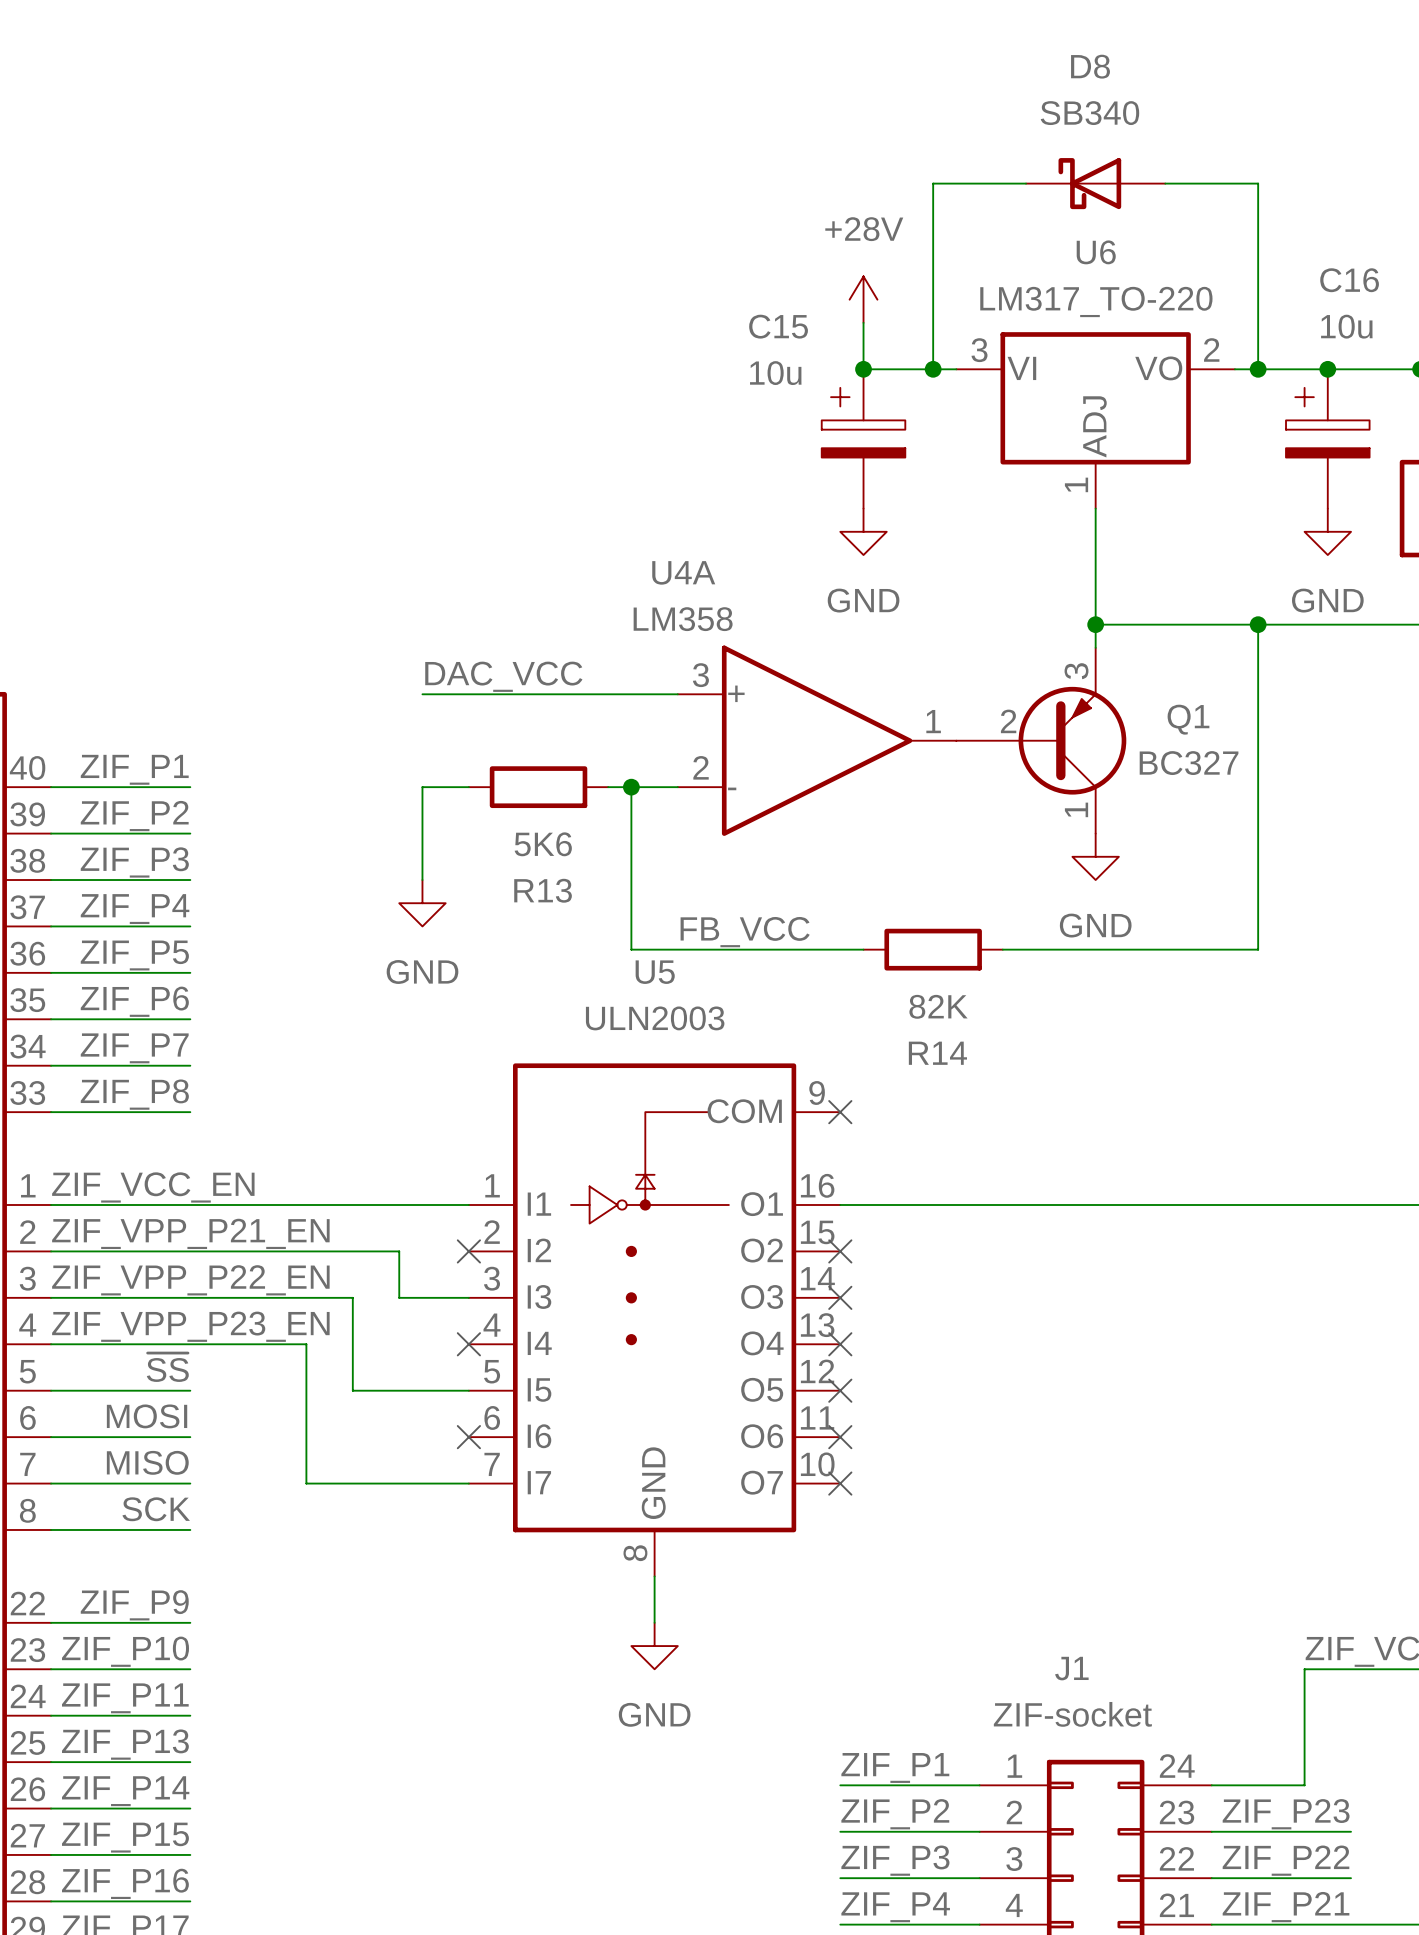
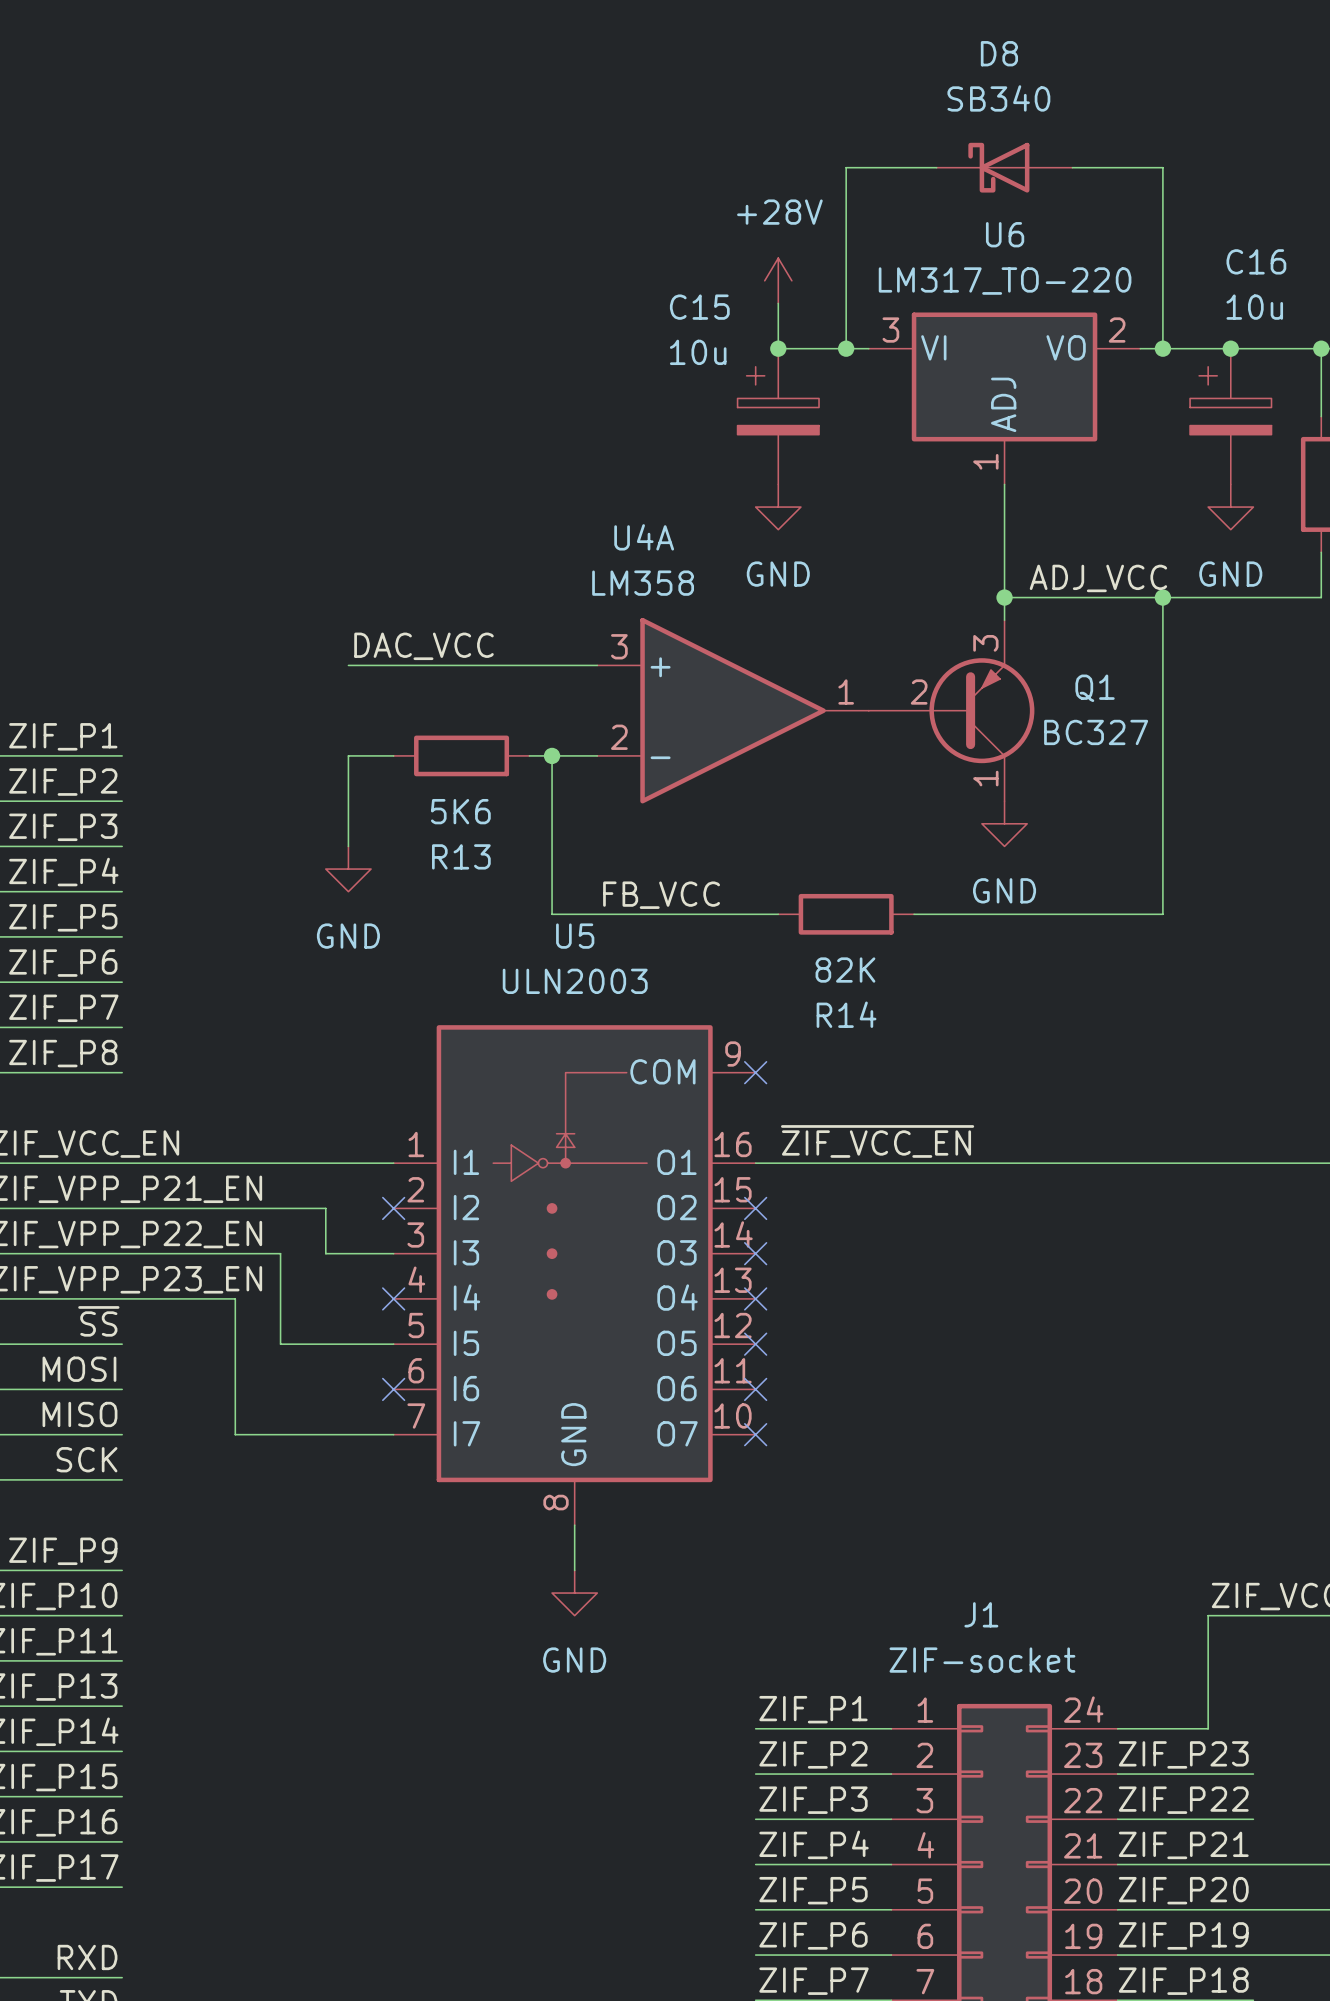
U4A name position: U4A (683, 572) -> U4A (644, 537)
label: none -> ADJ_VCC (1098, 578)
U4A value position: LM358 (683, 619) -> LM358 (643, 583)
label: none -> ~{ZIF_VCC_EN} (877, 1141)

